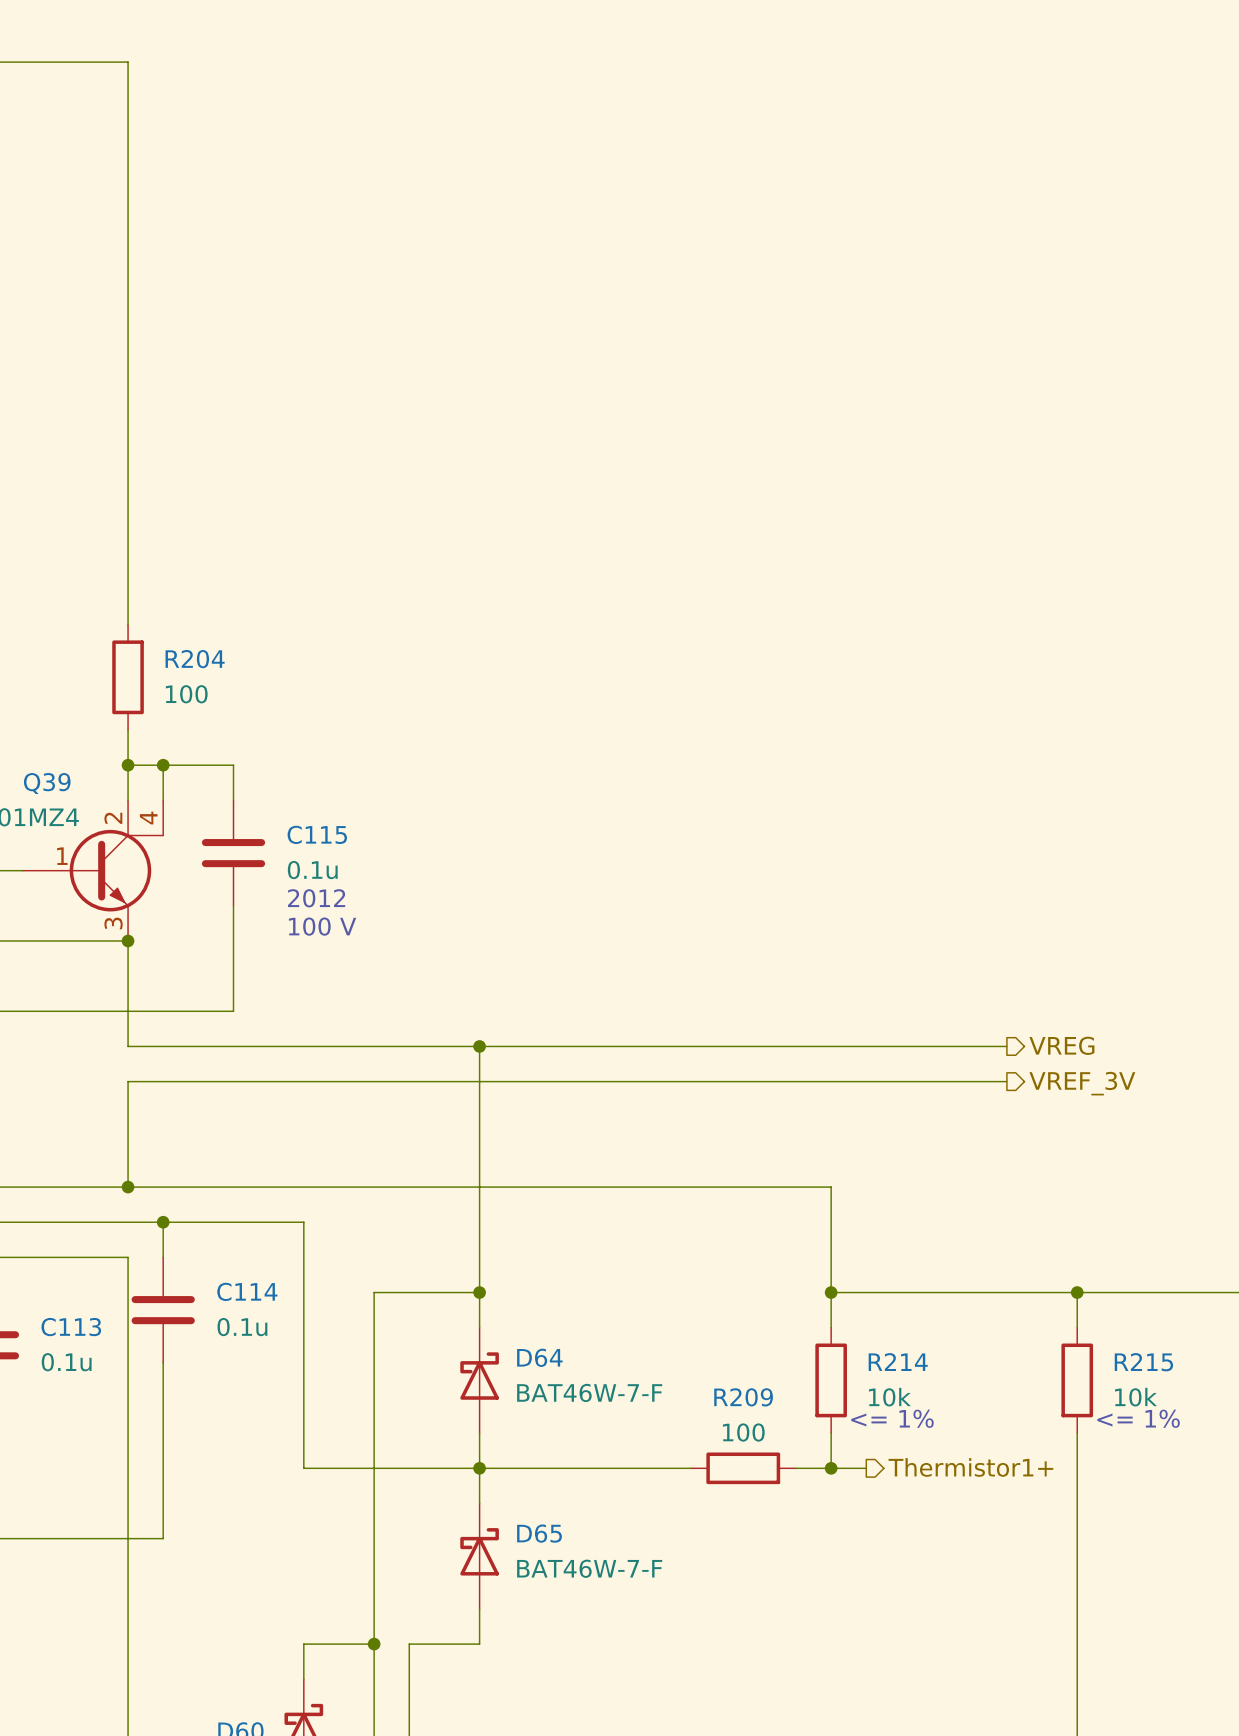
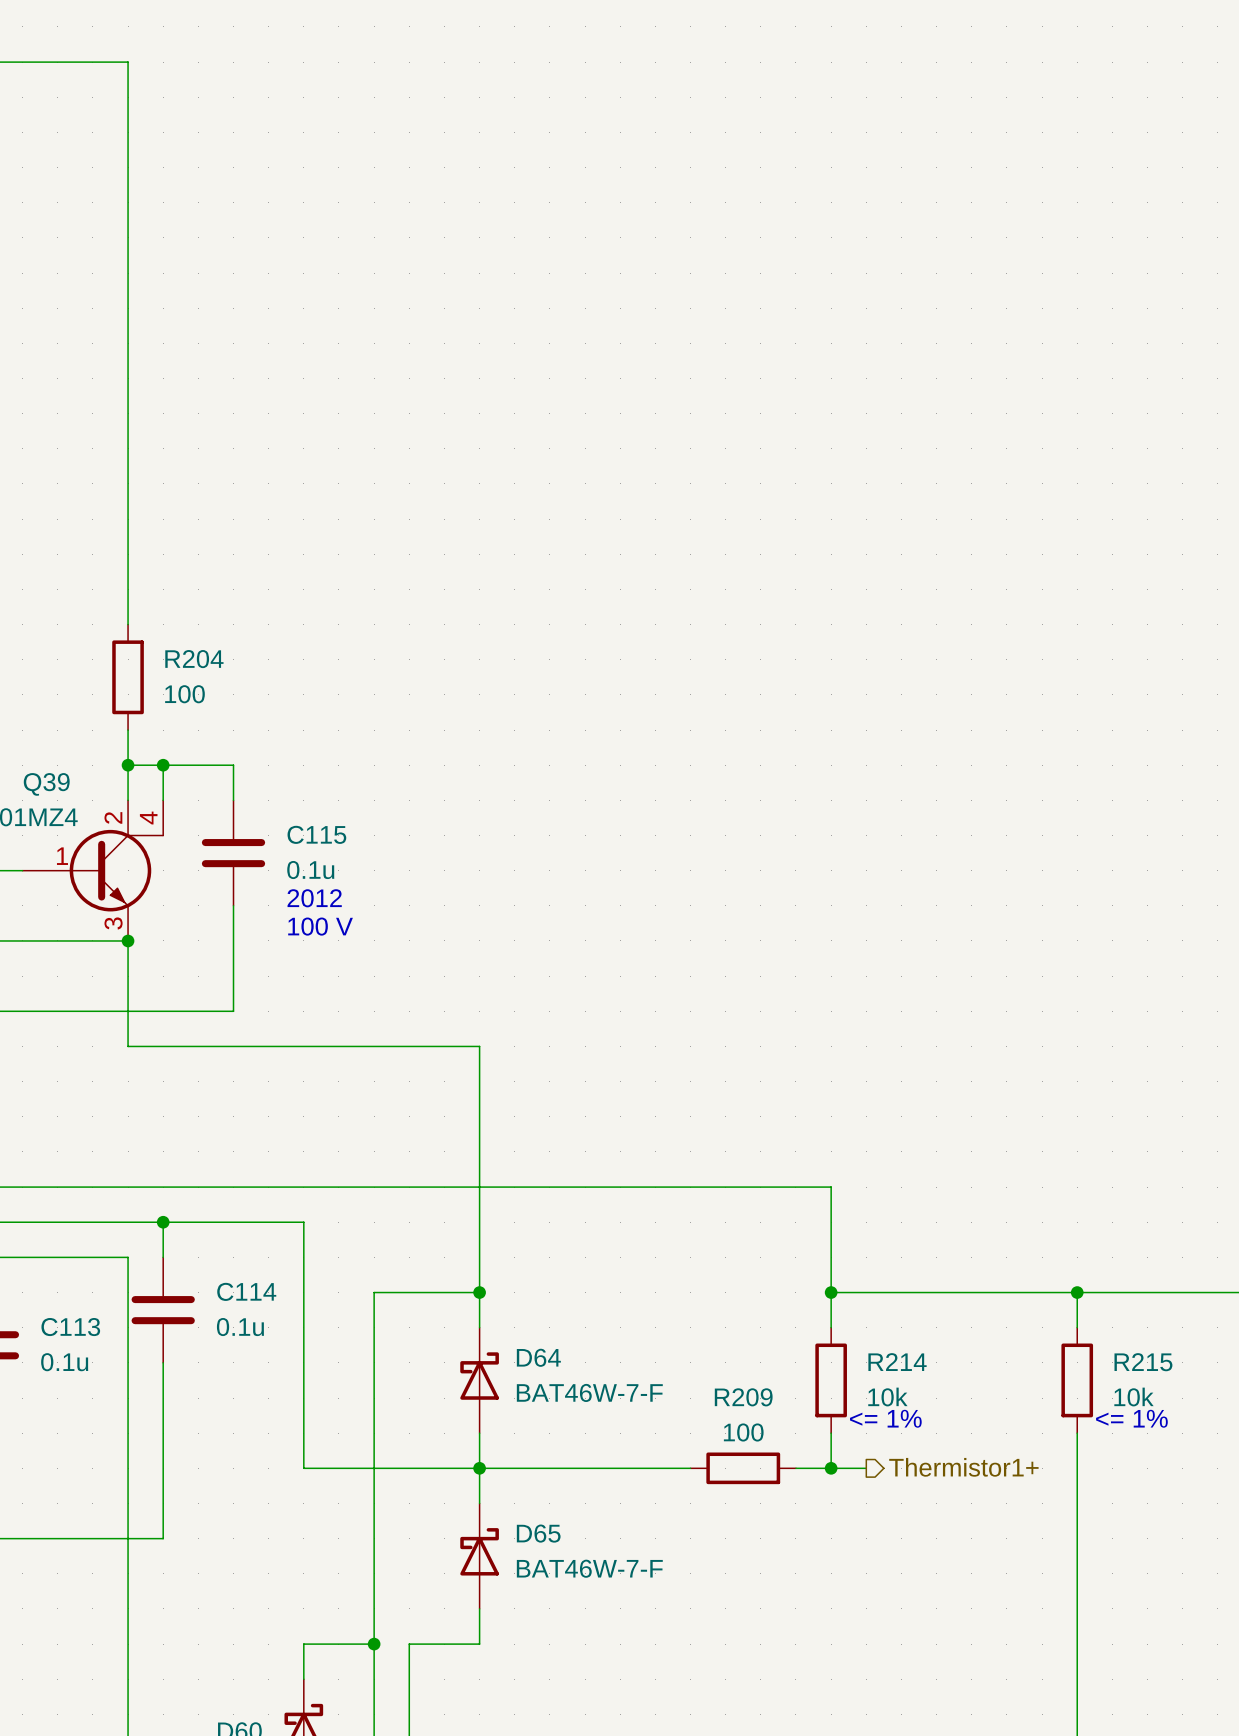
hierarchical label: VREG (1061, 1045) -> none
wire: (479, 1046) (1006, 1046) -> none
junction: (479, 1046) -> none
wire: (1006, 1081) (128, 1081) (128, 1187) -> none
hierarchical label: VREF_3V (1082, 1083) -> none
junction: (128, 1187) -> none

